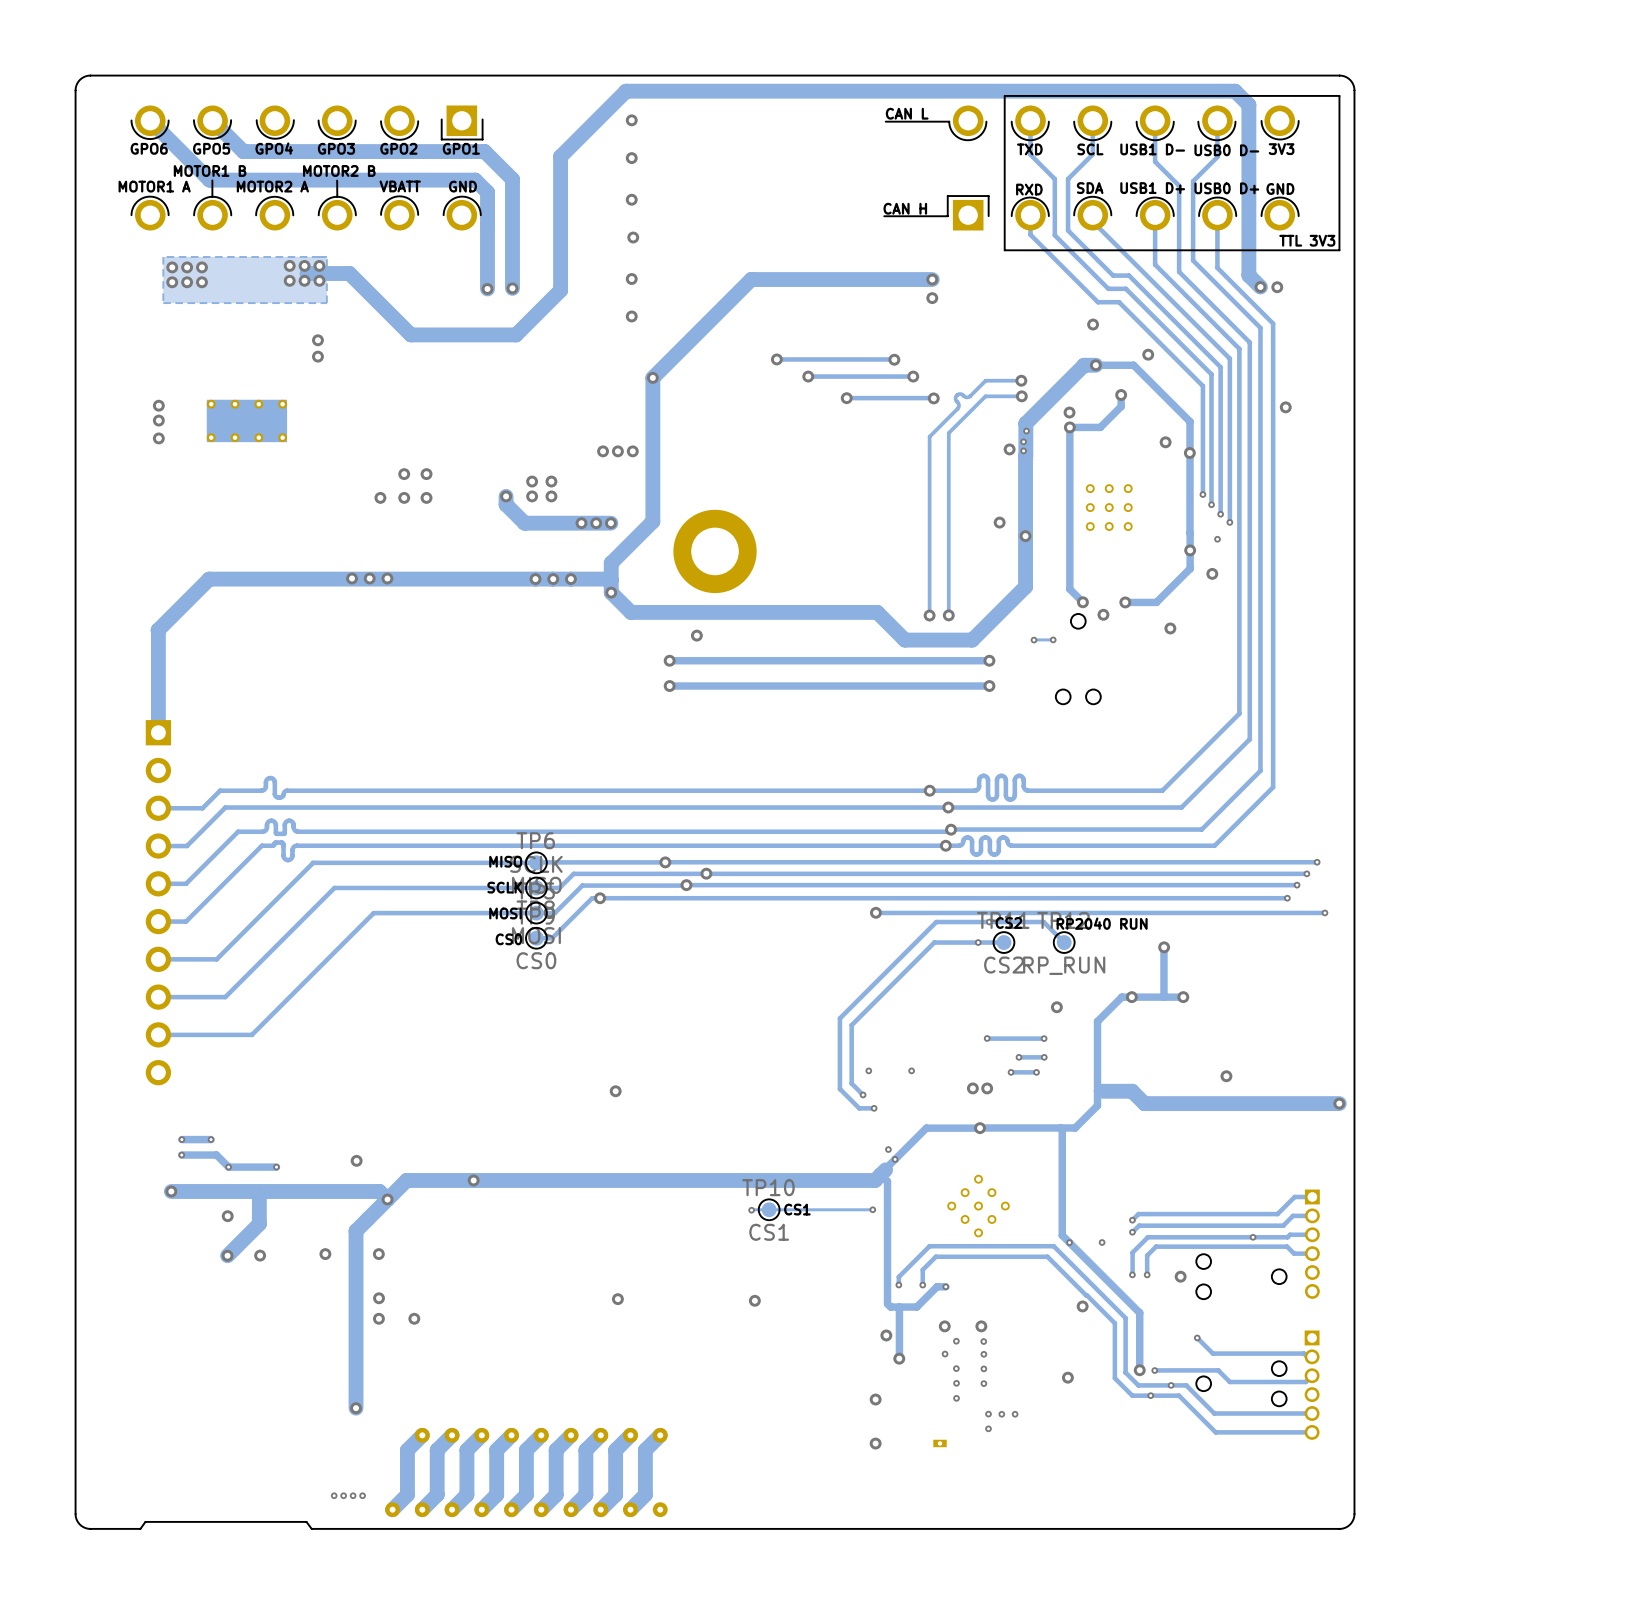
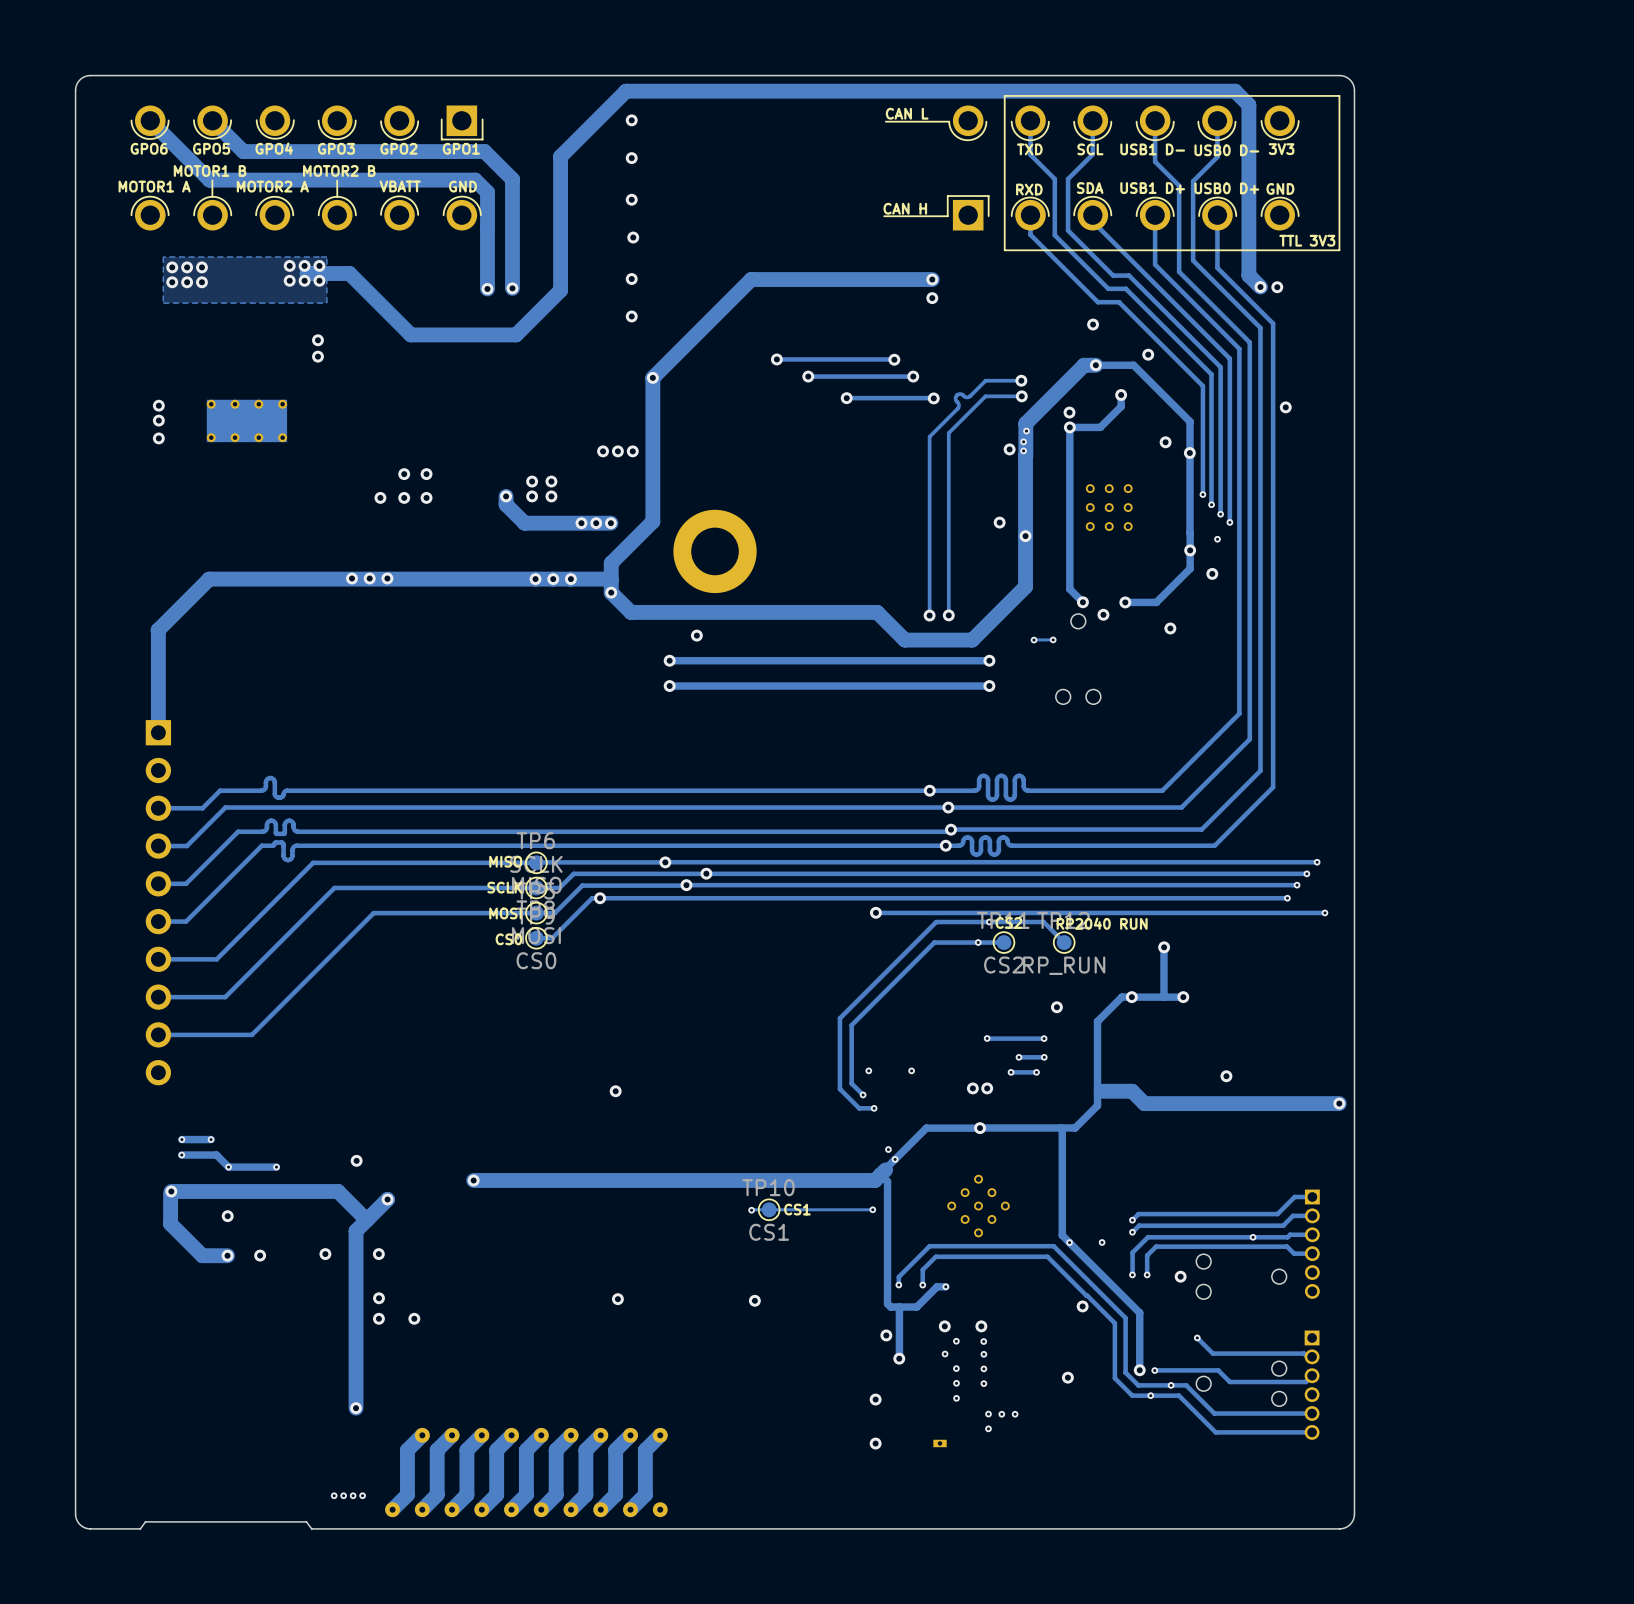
track: (473, 1180) (406, 1180) (387, 1199) (379, 1191) (338, 1191) -> (367, 1219) (338, 1191)
track: (259, 1192) (259, 1223) (227, 1255) -> (170, 1192) (170, 1223) (202, 1255) (227, 1255)

